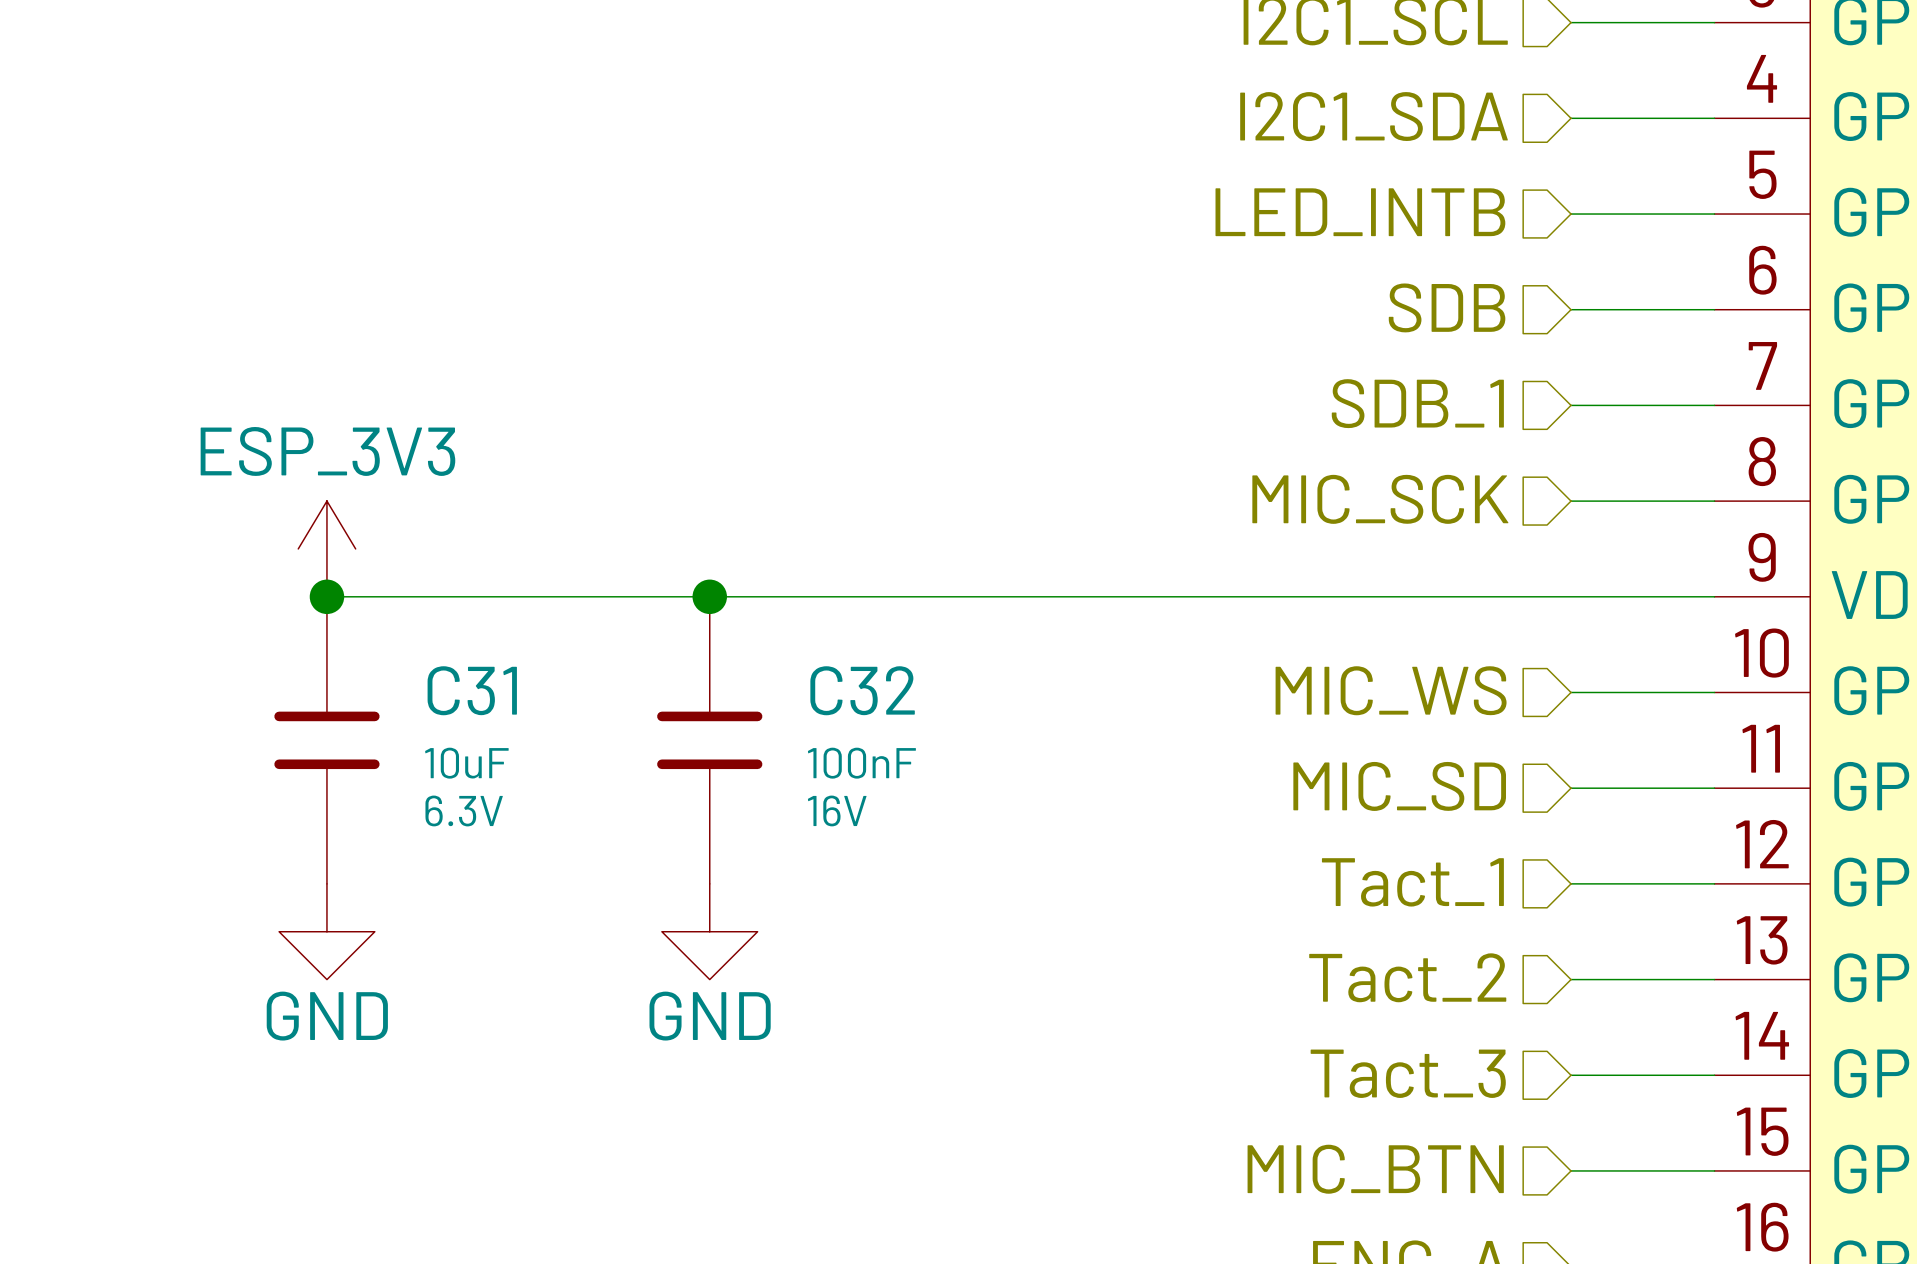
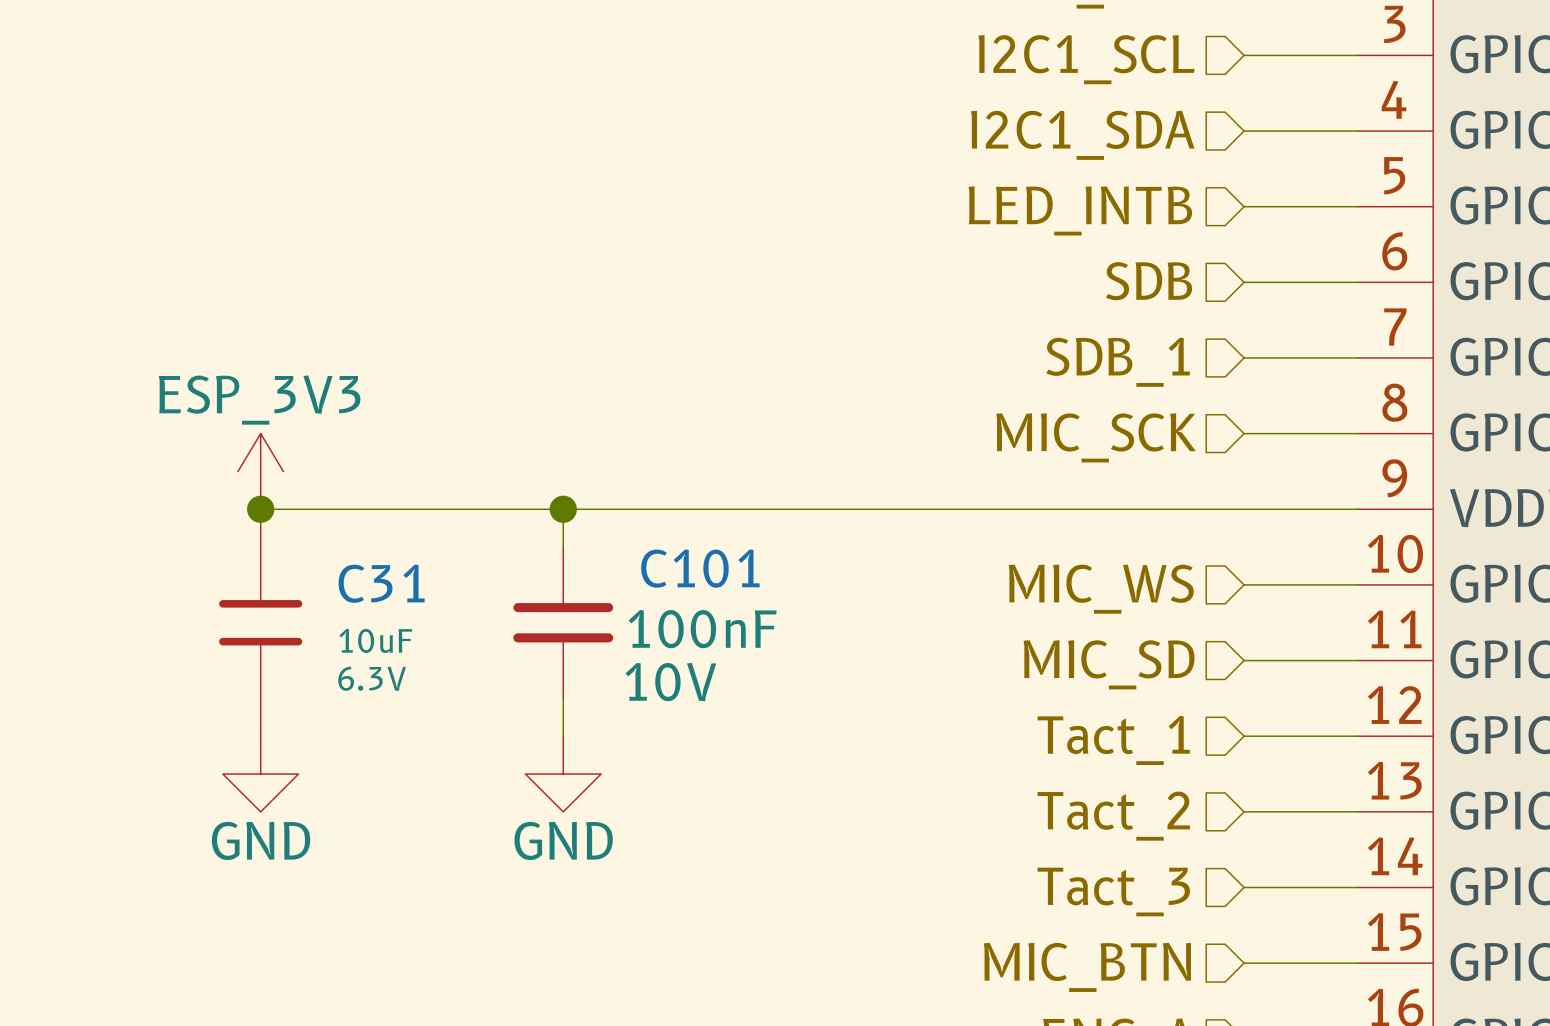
C32: 100nF (709, 740) -> none
C101: none -> 100nF (563, 622)

